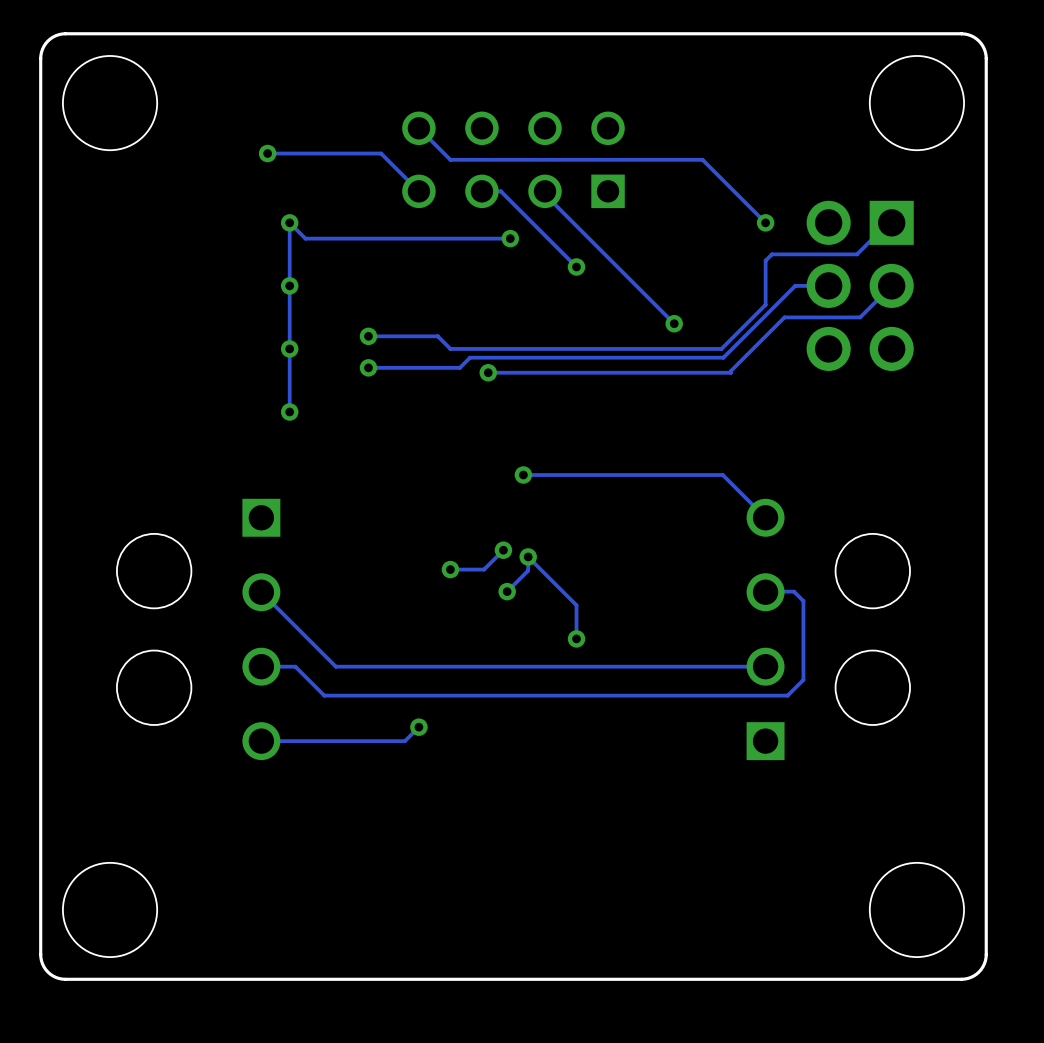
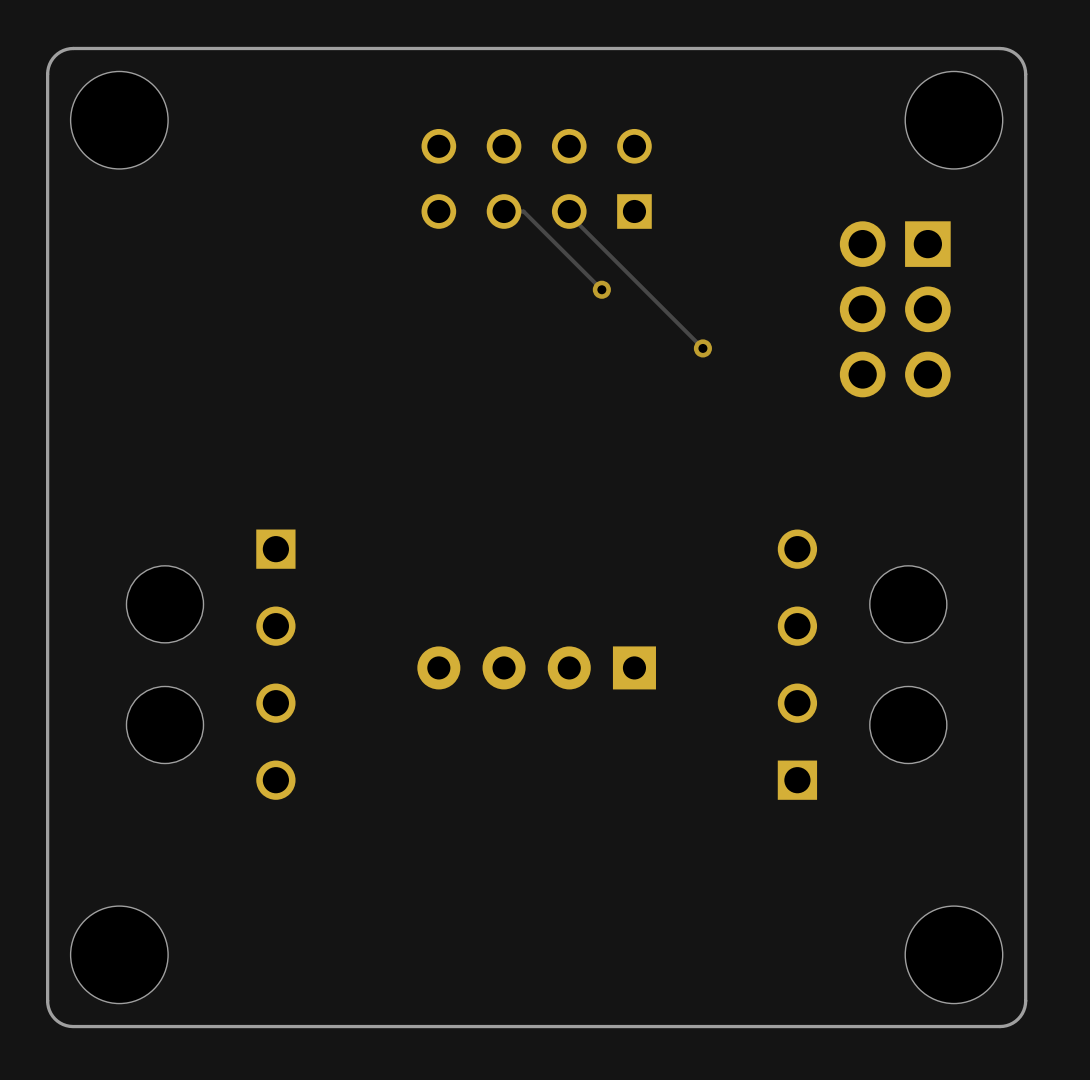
track: (418, 128) (450, 159) (702, 159) (765, 222) -> none
track: (267, 153) (381, 153) (418, 191) -> none
via: (267, 153) -> none
via: (289, 222) -> none
via: (765, 222) -> none
track: (891, 222) (888, 222) (857, 254) (771, 254) (765, 260) (765, 304) (721, 348) (450, 348) (437, 336) (368, 336) -> none
track: (510, 238) (305, 238) (289, 222) (289, 411) -> none
via: (510, 238) -> none
via: (289, 285) -> none
track: (828, 285) (795, 285) (723, 357) (470, 357) (459, 367) (368, 367) -> none
track: (879, 285) (891, 285) (860, 317) (784, 317) (730, 372) (488, 372) -> none
via: (368, 336) -> none
via: (289, 348) -> none
via: (368, 367) -> none
via: (488, 372) -> none
via: (289, 411) -> none
track: (523, 475) (722, 475) (765, 517) -> none
via: (523, 475) -> none
track: (503, 550) (484, 569) (450, 569) -> none
via: (503, 550) -> none
via: (528, 556) -> none
via: (450, 569) -> none
track: (507, 591) (528, 570) (528, 556) (576, 605) (576, 638) -> none
via: (507, 591) -> none
track: (261, 592) (335, 666) (765, 666) -> none
track: (765, 592) (793, 591) (803, 601) (803, 679) (787, 695) (324, 695) (295, 666) (261, 666) -> none
part: none -> (536, 667)
via: (576, 638) -> none
track: (418, 727) (404, 741) (261, 741) -> none
via: (418, 727) -> none

